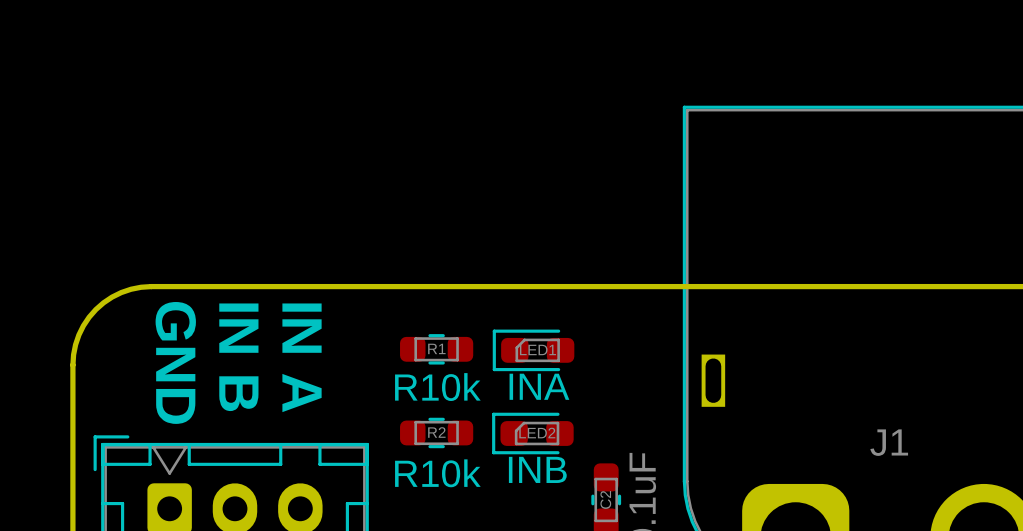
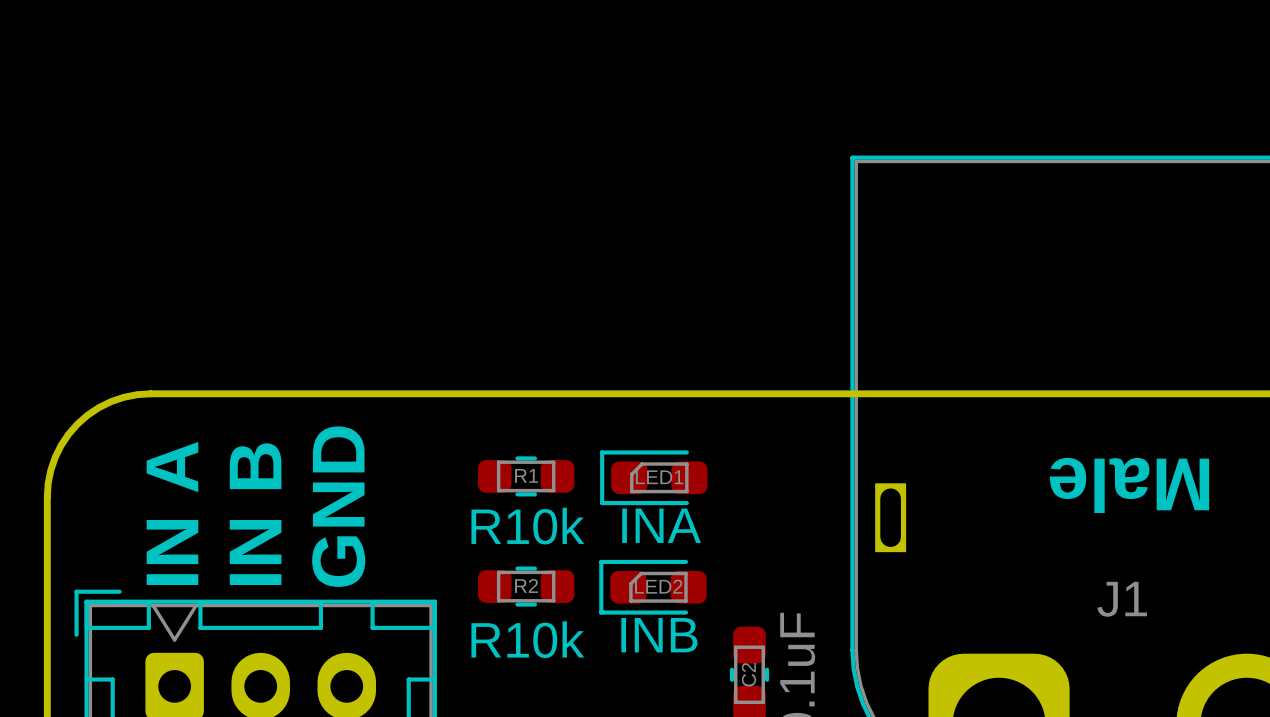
text: none -> Male (1129, 485)
text rotation: 0° (238, 357) -> 180° (255, 514)
text rotation: 0° (302, 357) -> 180° (172, 513)
text rotation: 0° (175, 362) -> 180° (338, 506)

